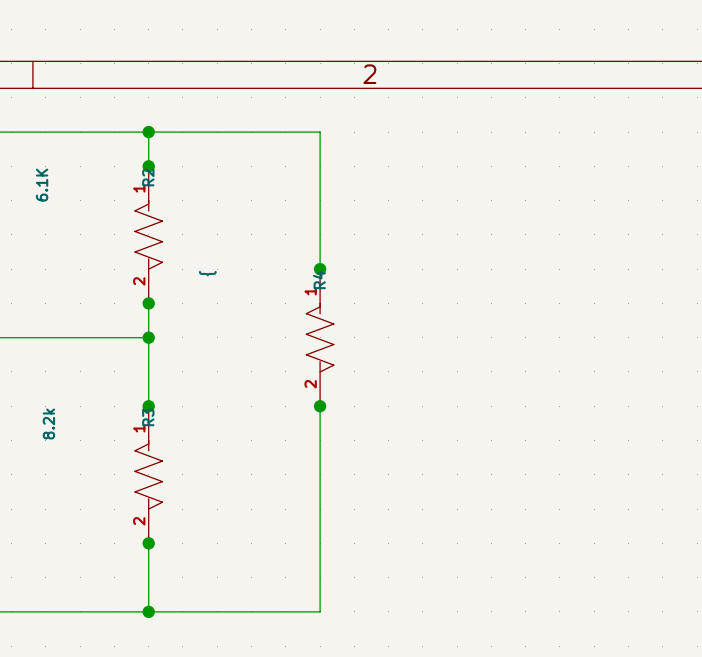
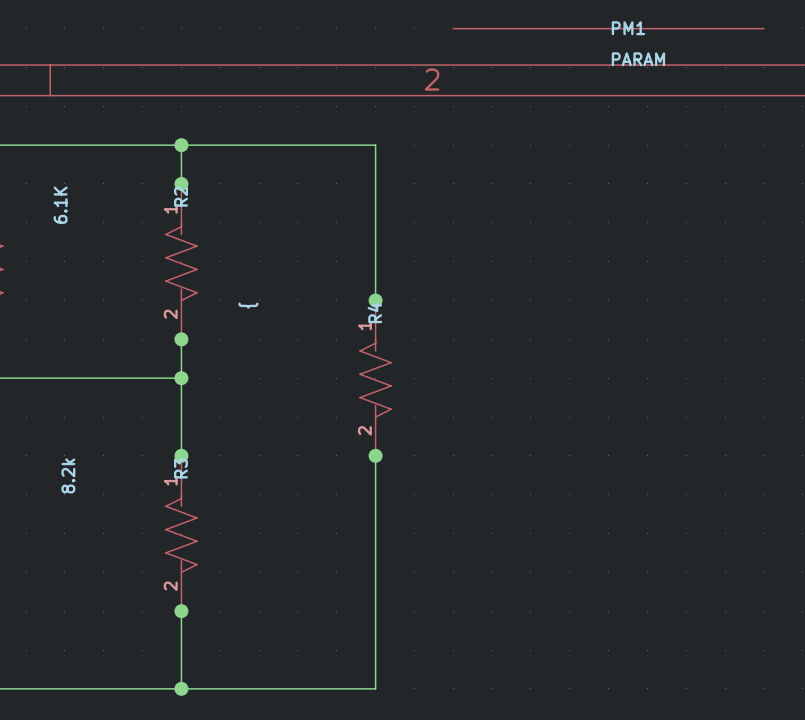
PM1: none -> PARAM (608, 28)

